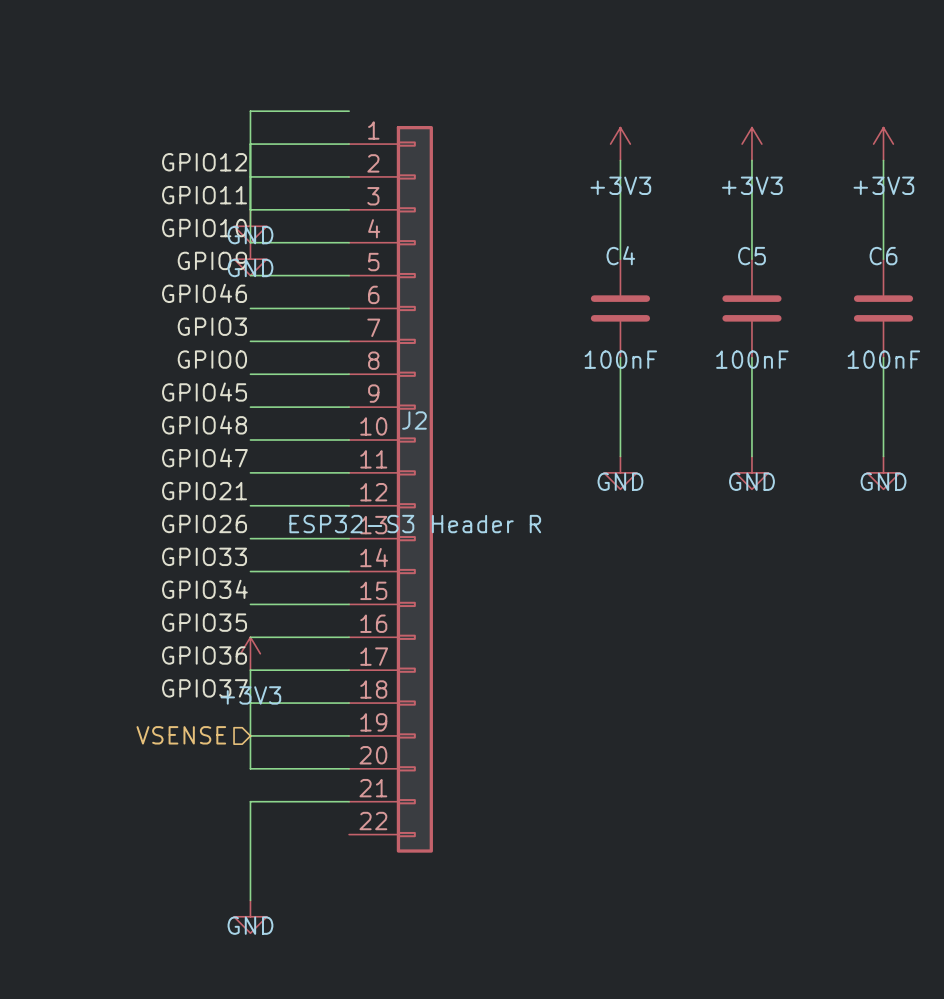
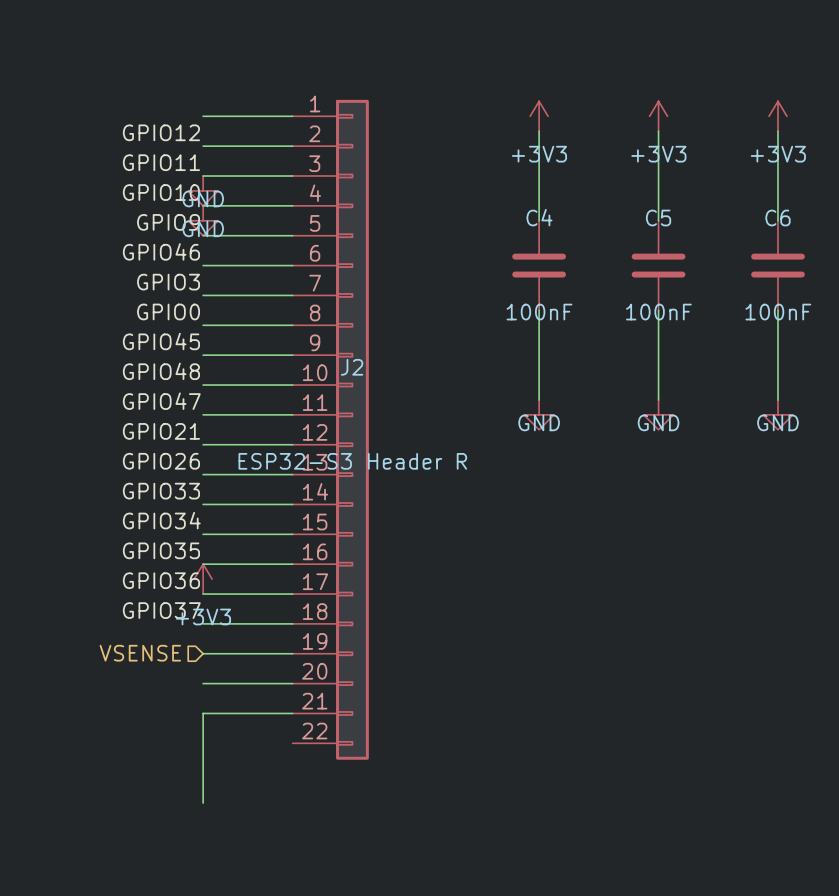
wire: (349, 111) (250, 111) (250, 242) -> none
wire: (250, 670) (250, 768) -> none
power symbol: GND (250, 916) -> none

